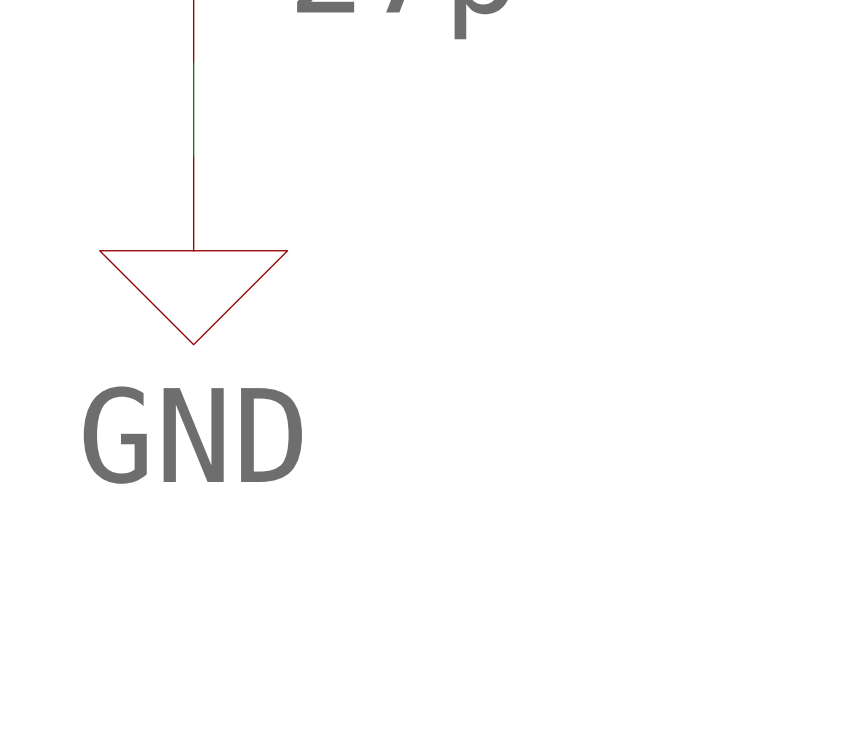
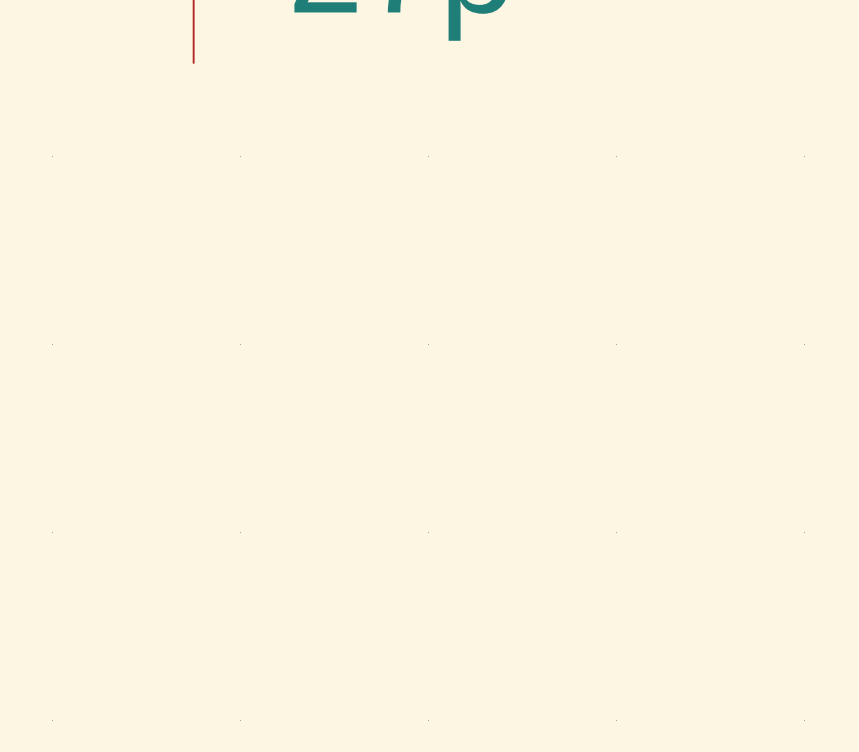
wire: (193, 62) (193, 156) -> none
power symbol: GND (193, 250) -> none

